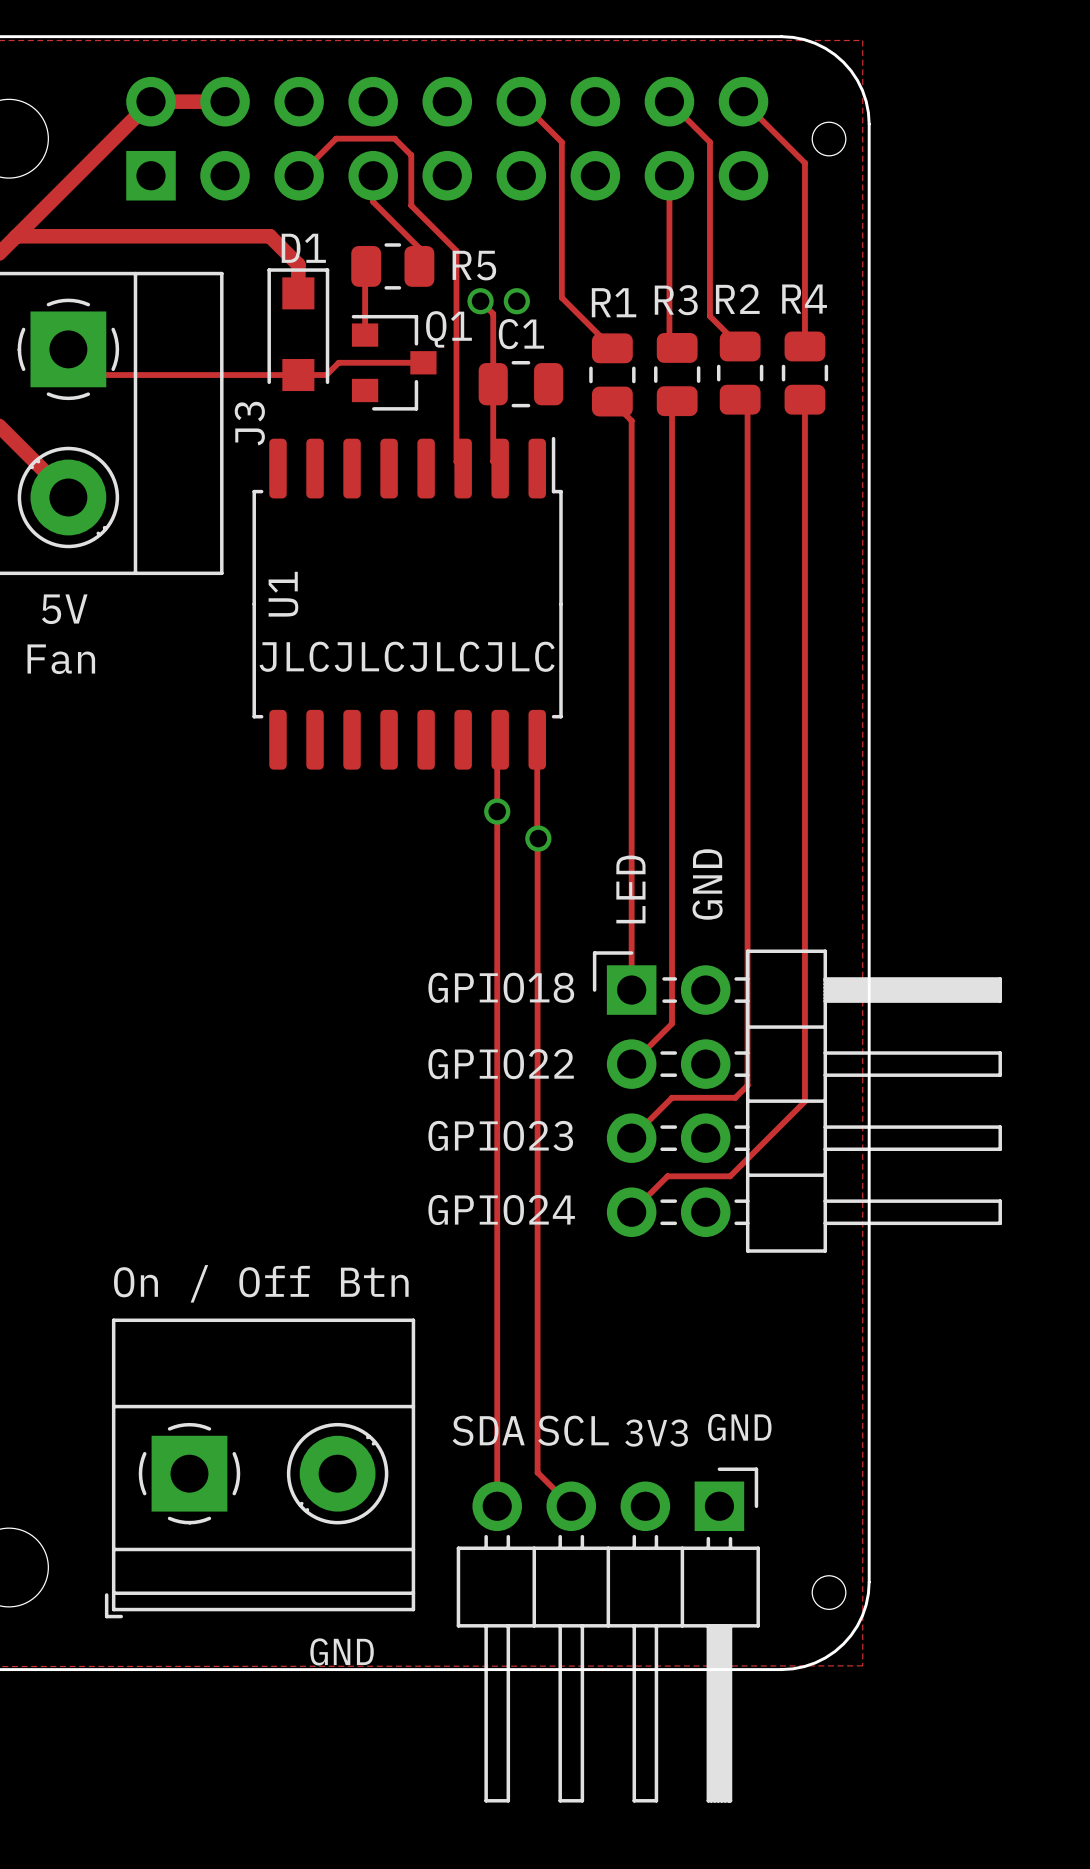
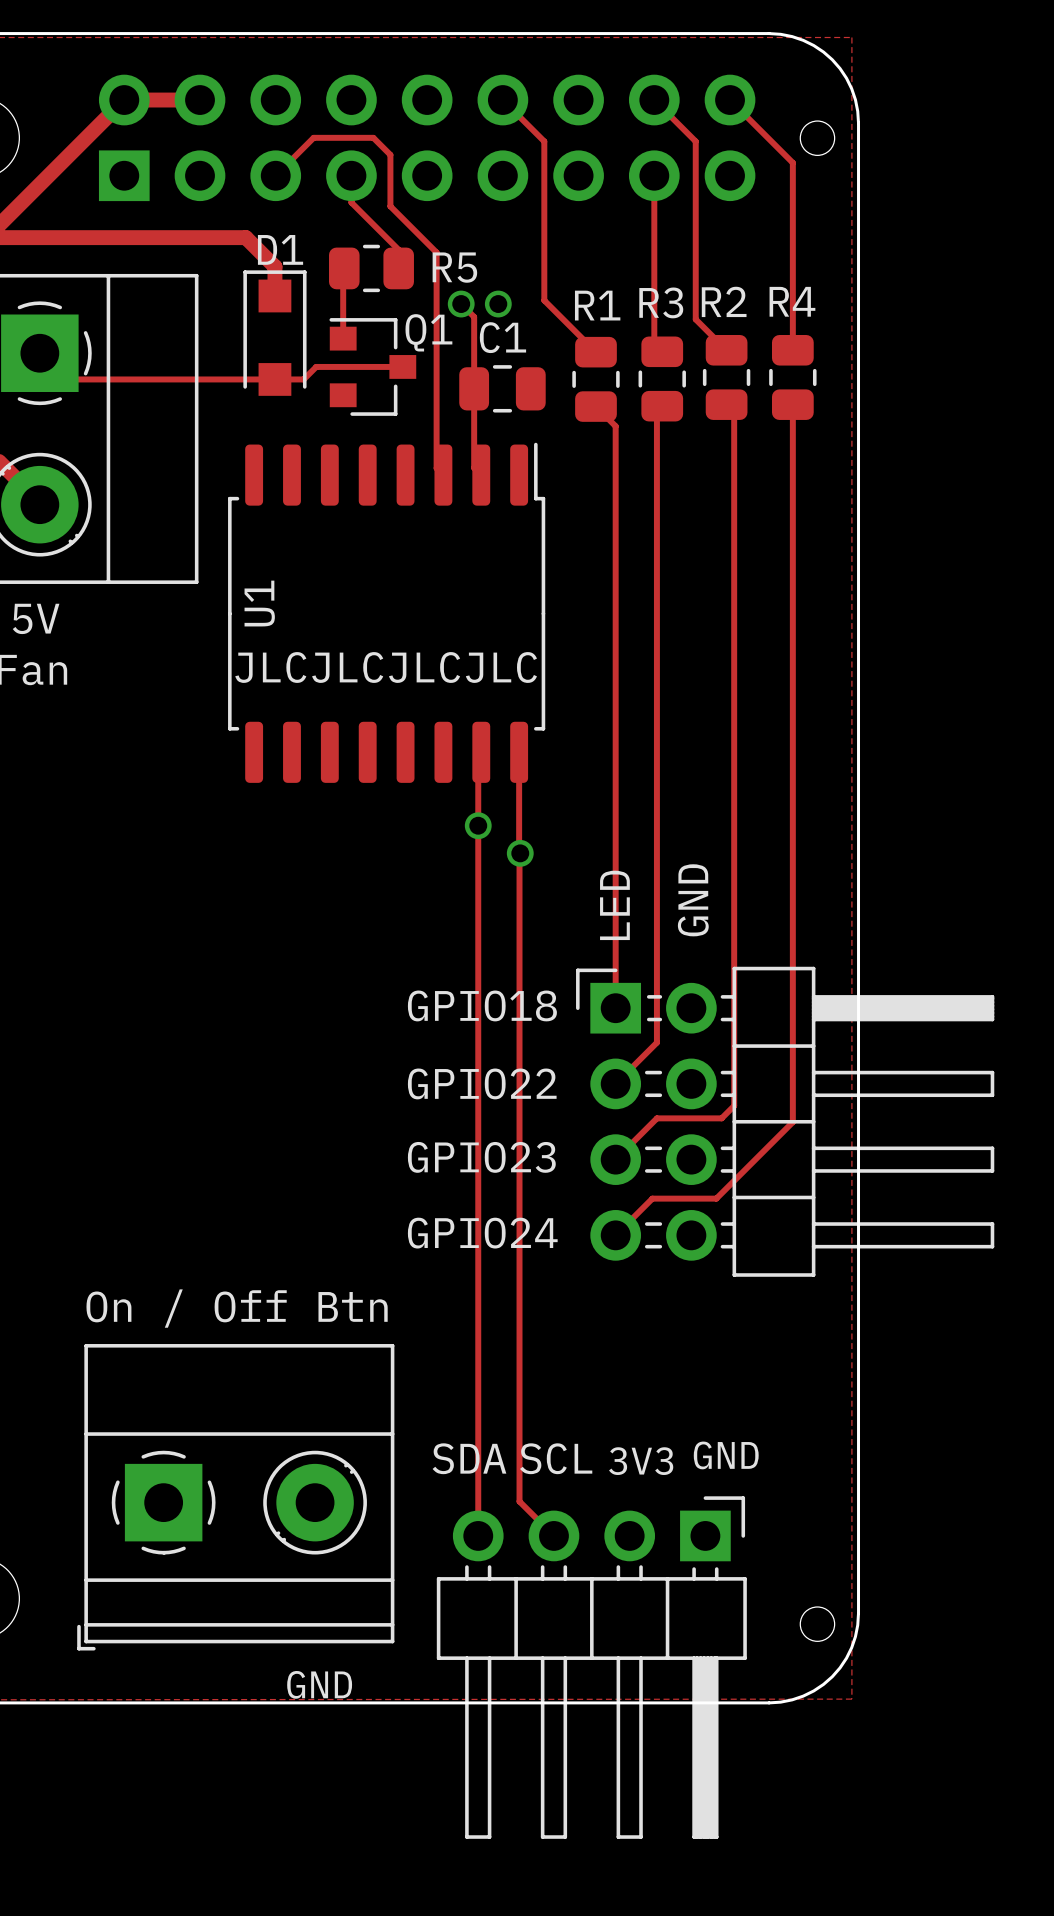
J3 name: J3 (249, 423) -> none

